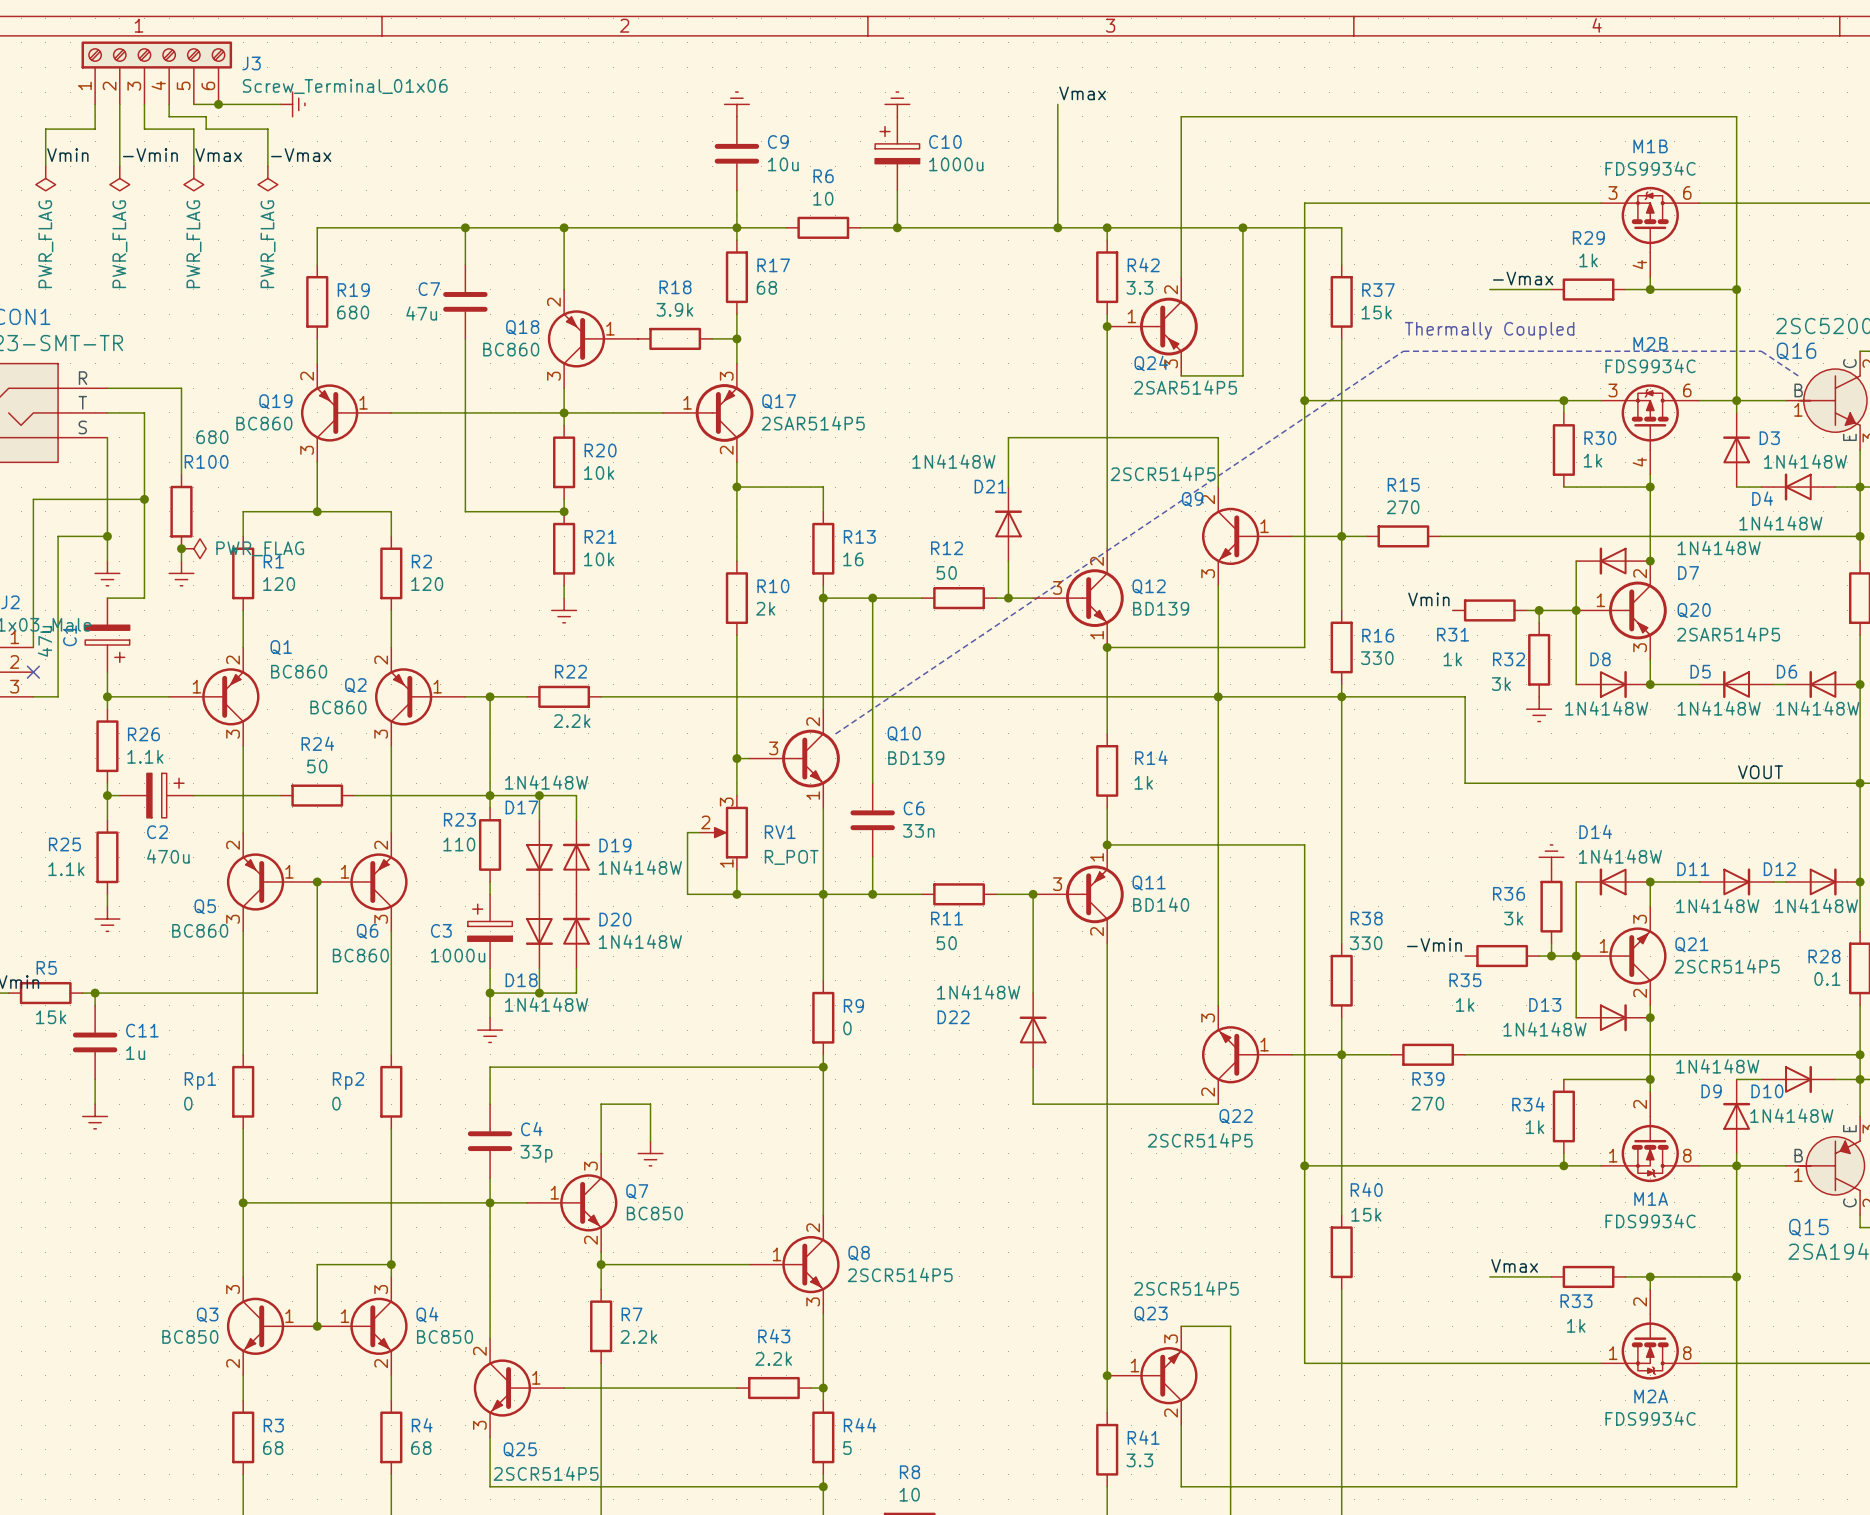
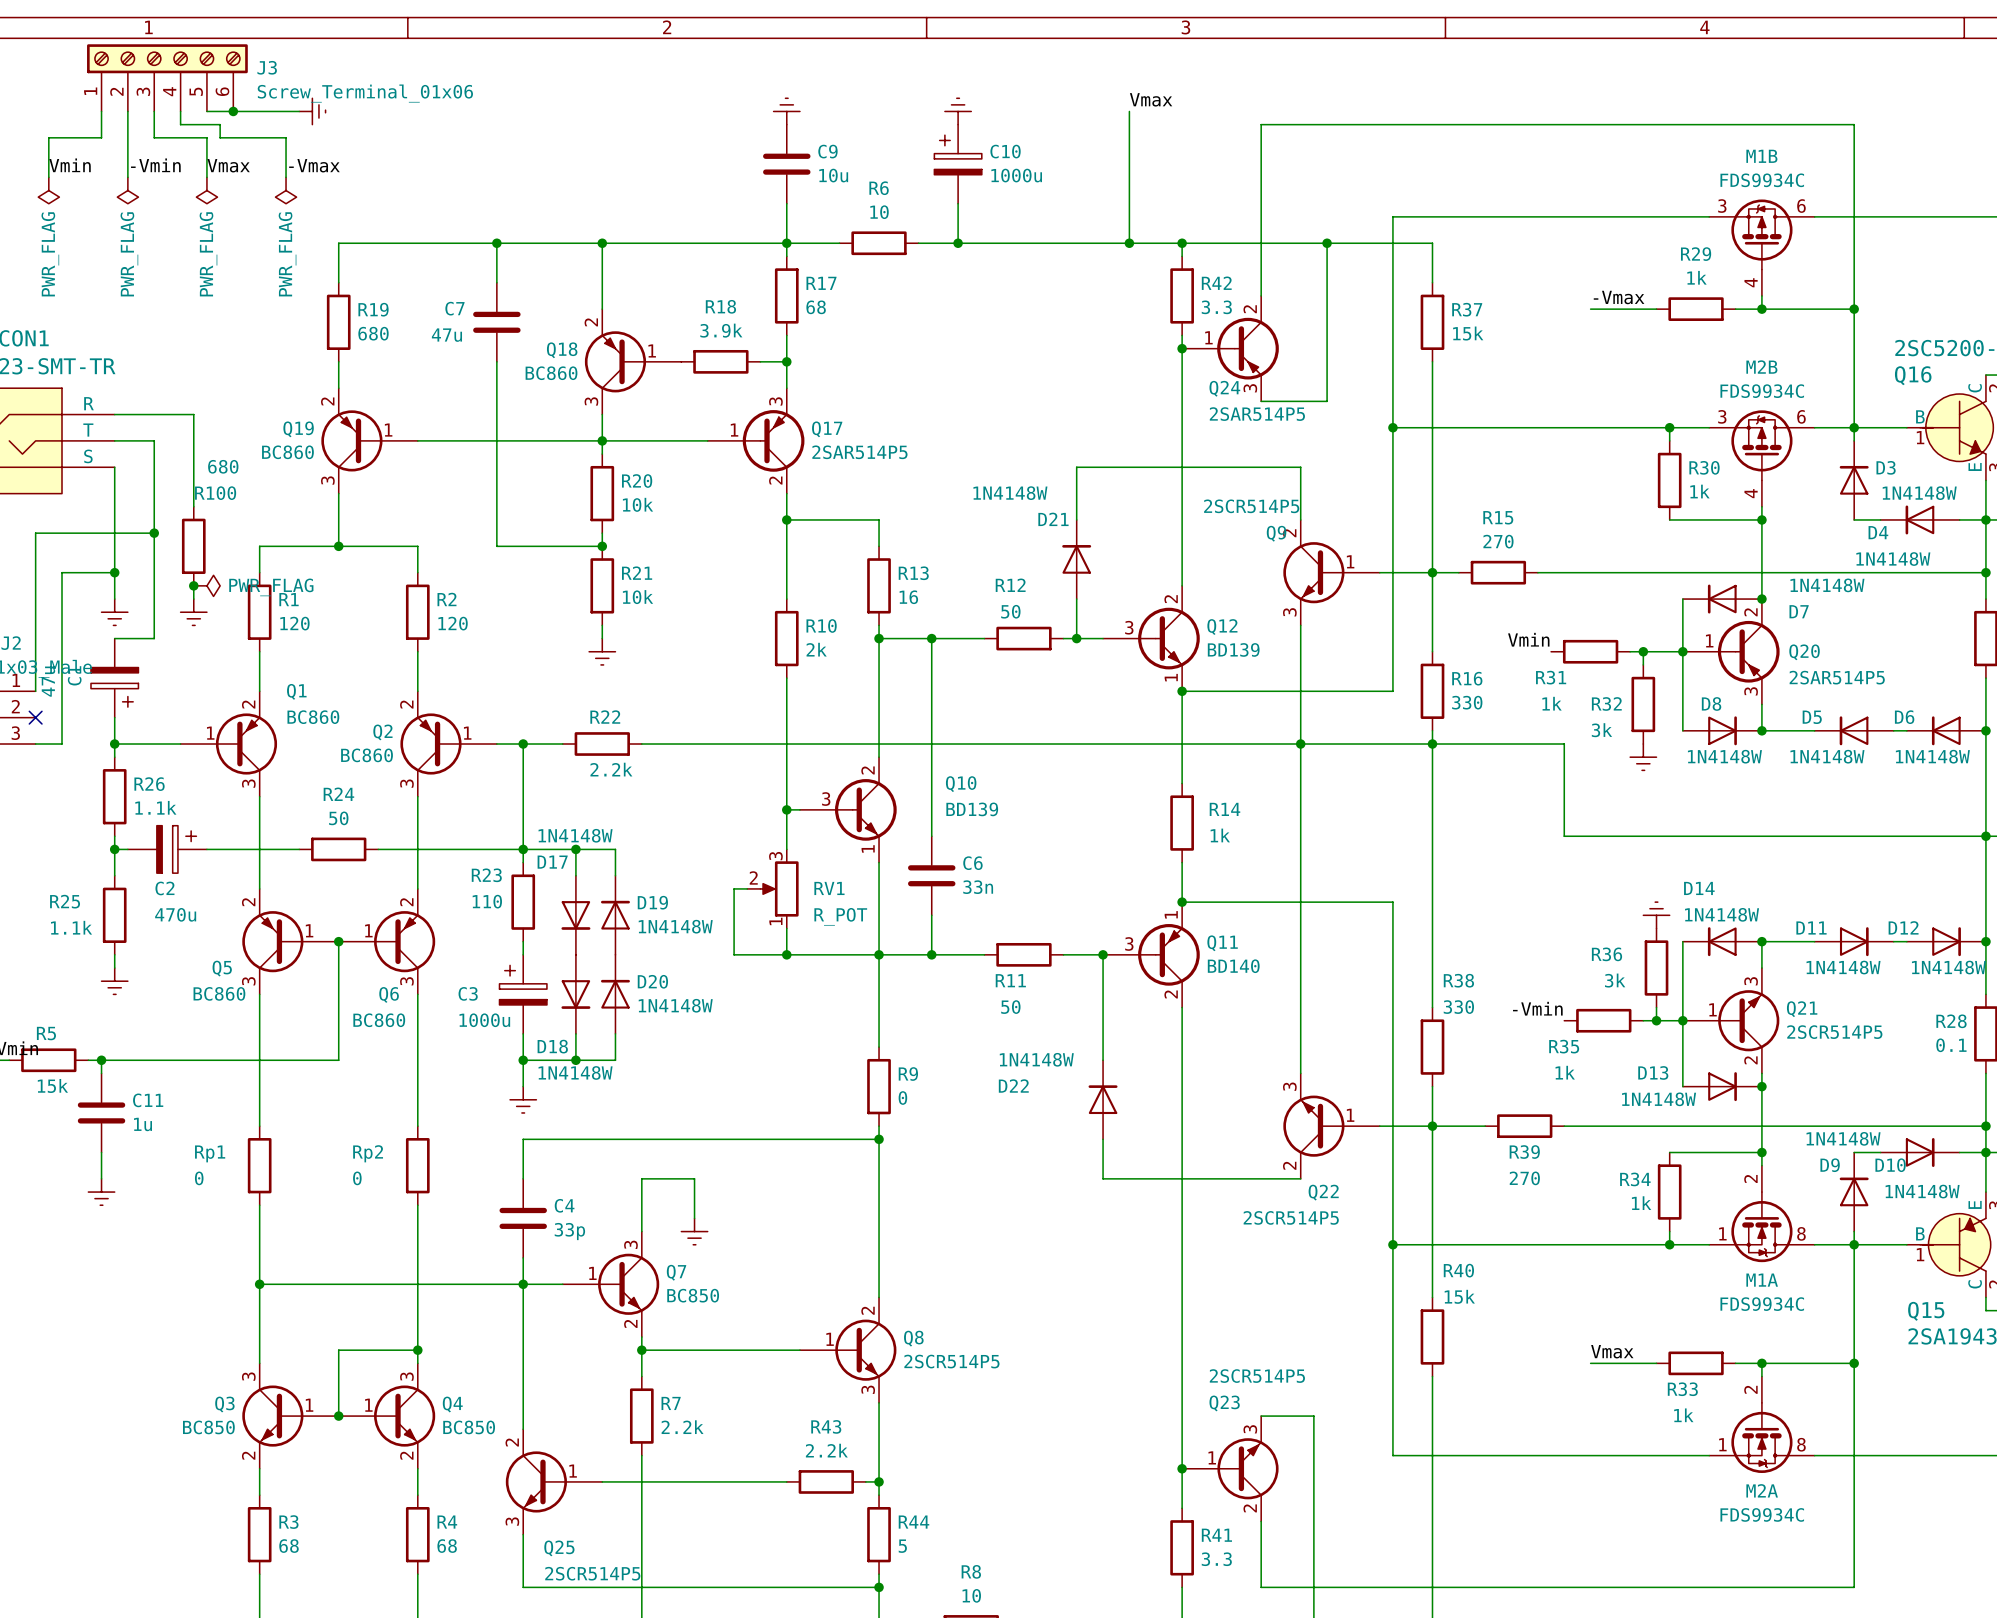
text: Thermally Coupled (1489, 330) -> none
line: (1798, 375) (1761, 351) (1403, 351) (835, 733) -> none
label: VOUT (1760, 772) -> none

